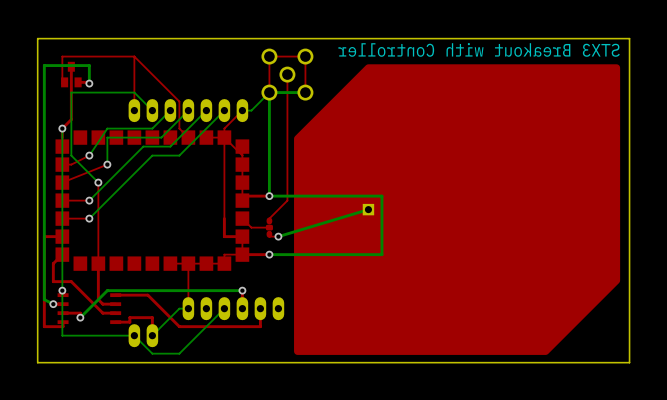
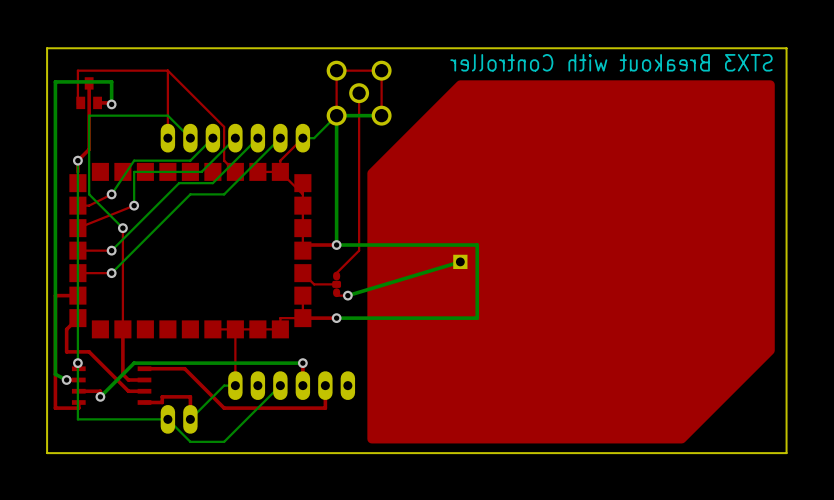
top track: (224, 137) (224, 236) (242, 236) -> none

